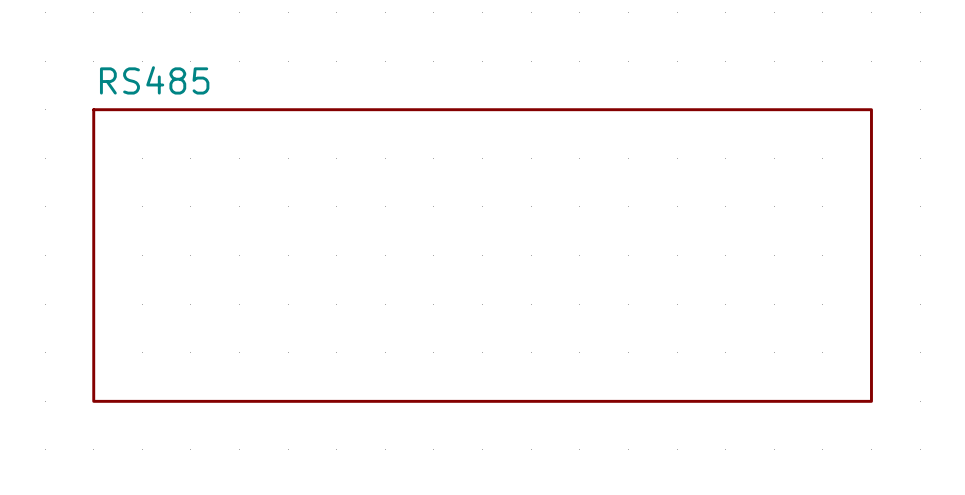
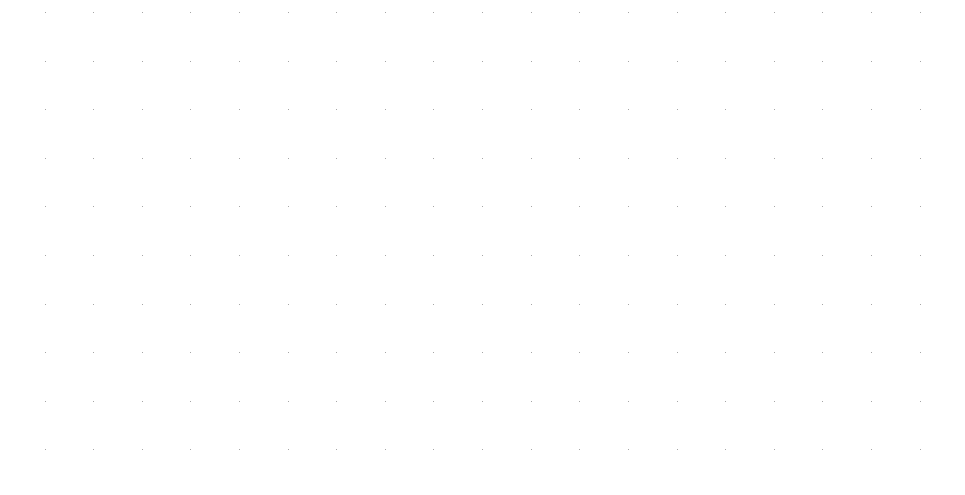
sheet RS485: (482, 255) -> none

